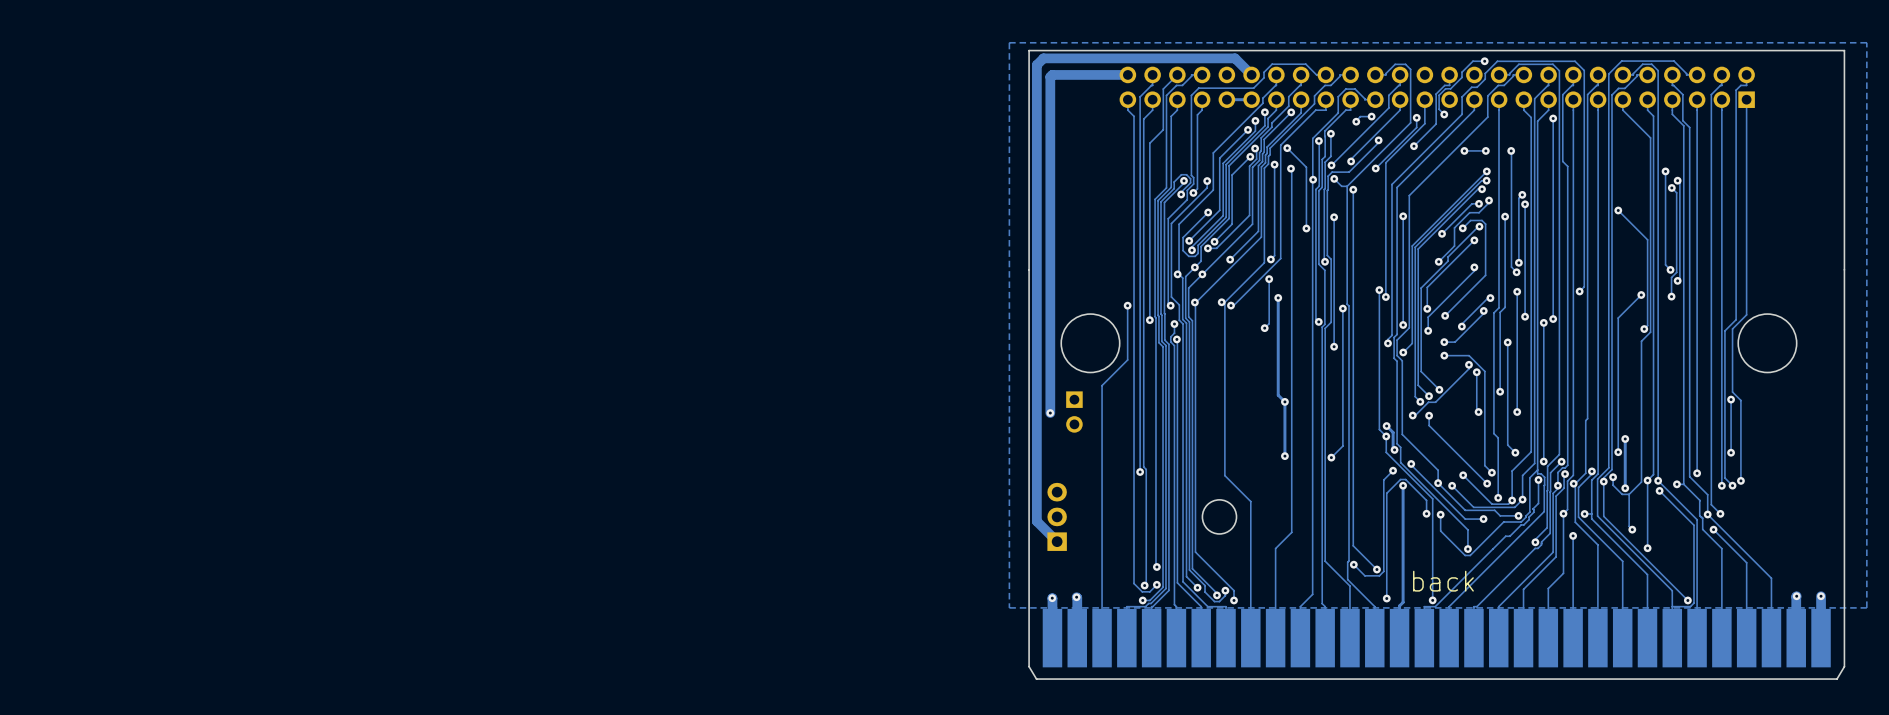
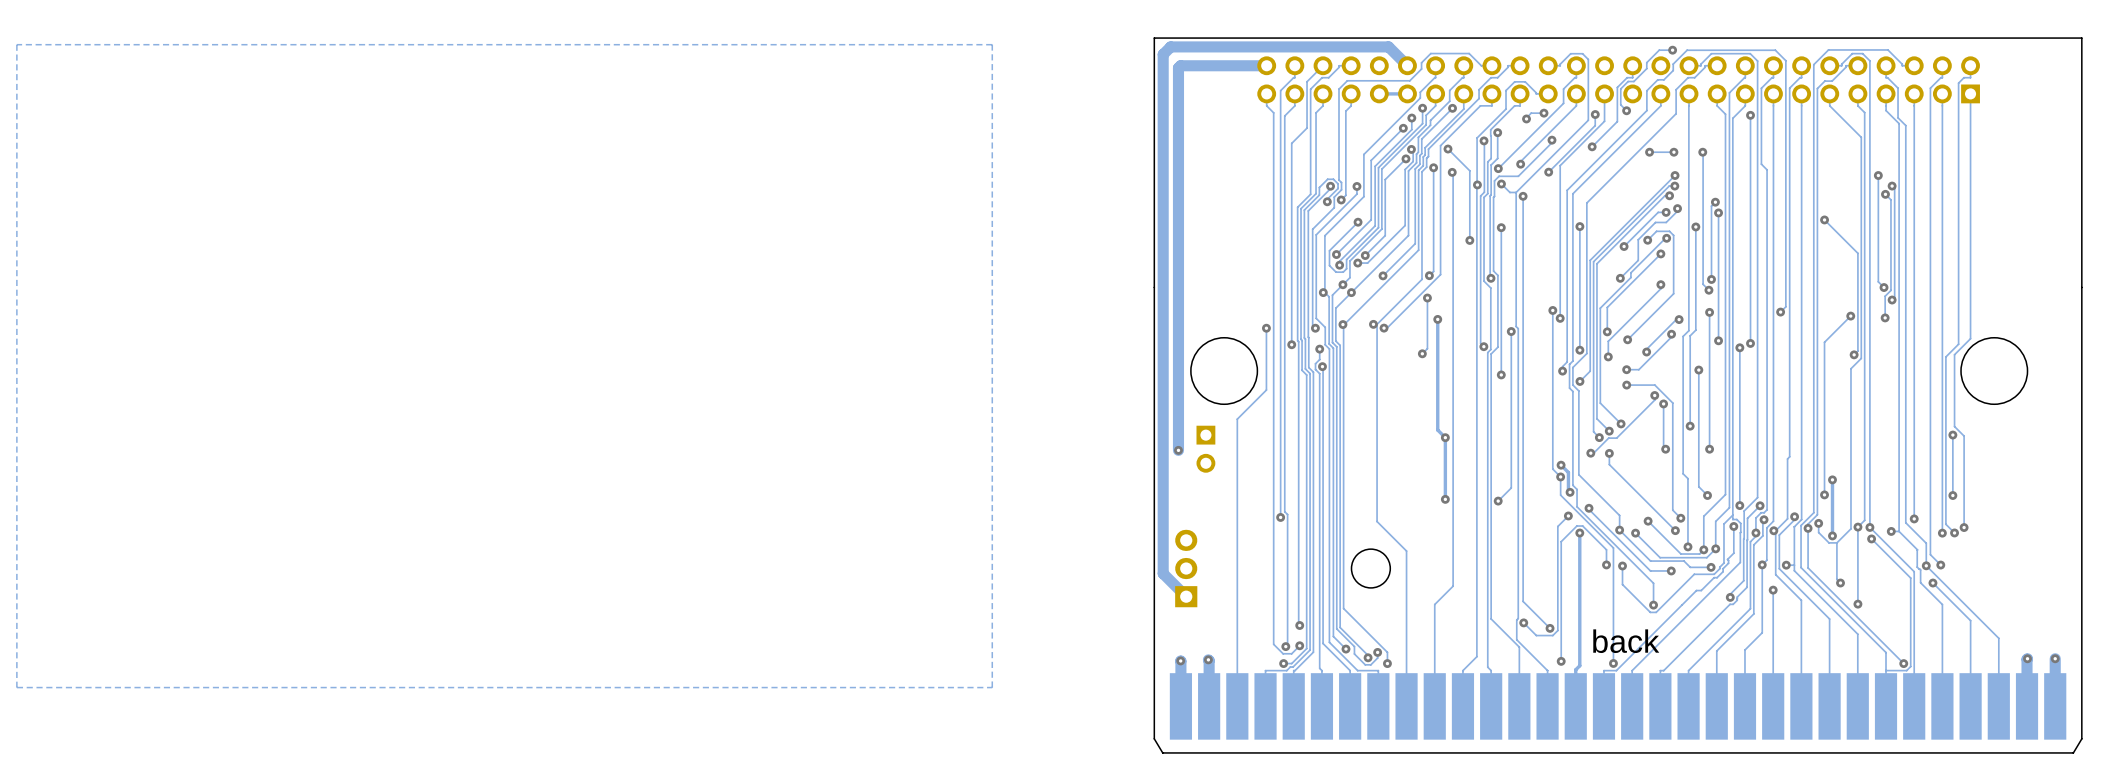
zone outline: (1866, 42) (1009, 42) (1009, 607) (1866, 607) (1866, 42) -> none
zone outline: none -> (992, 44) (16, 44) (16, 687) (992, 687) (992, 44)

